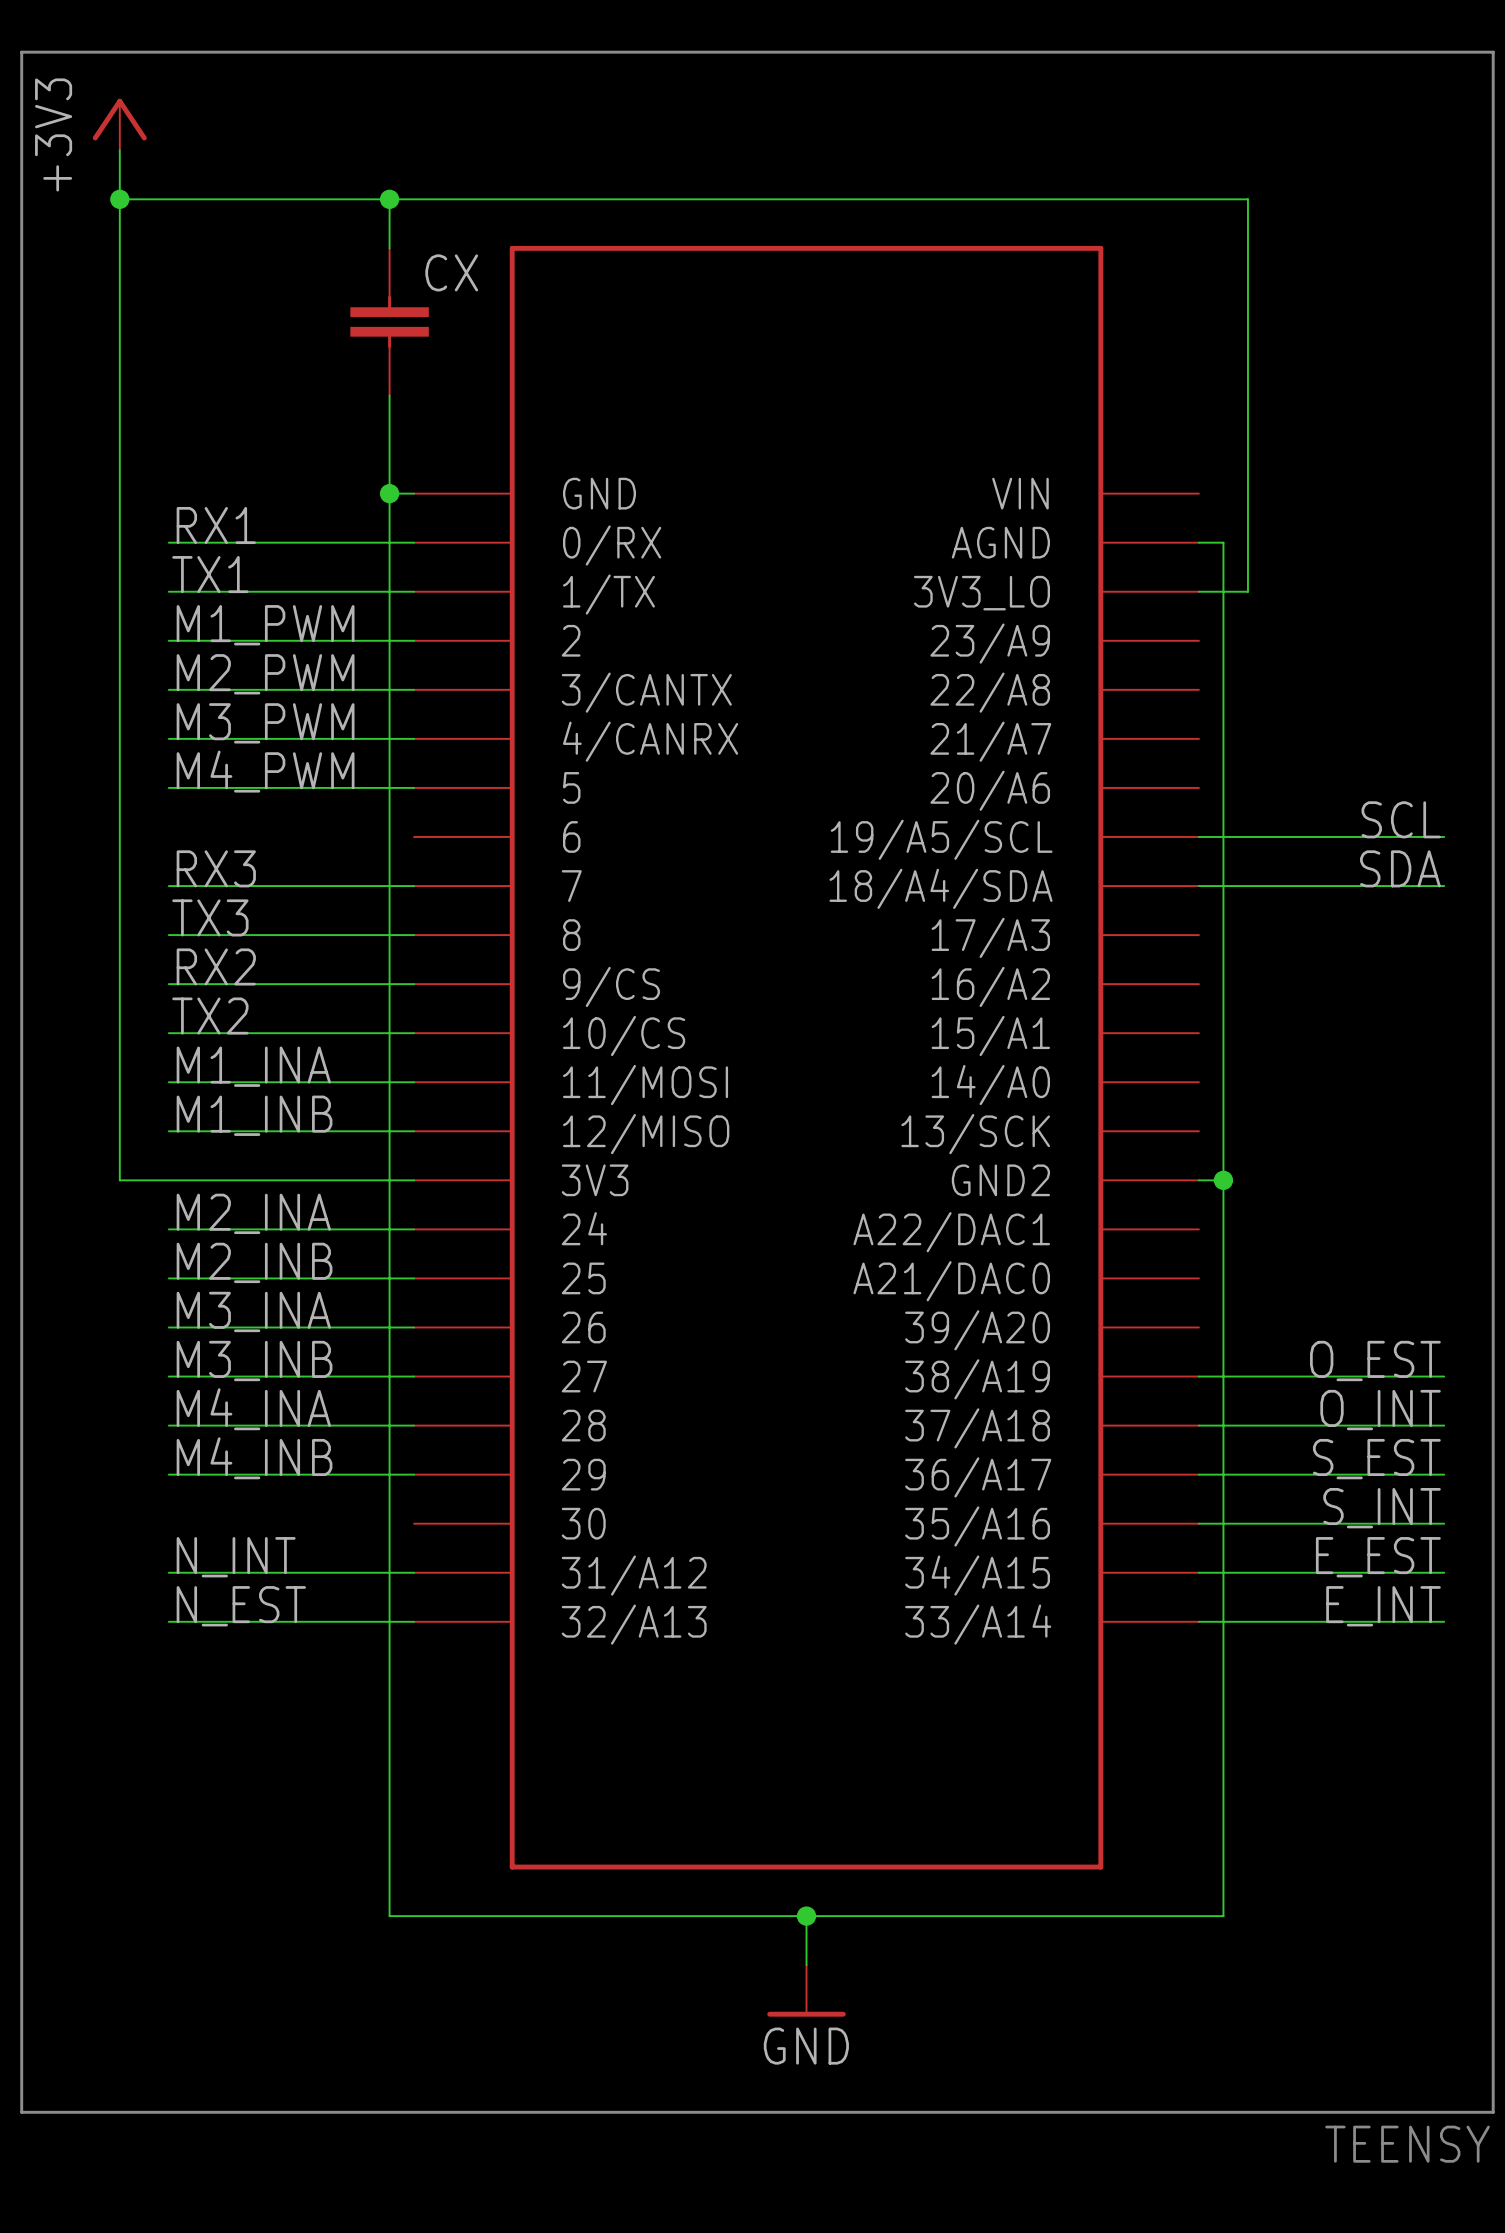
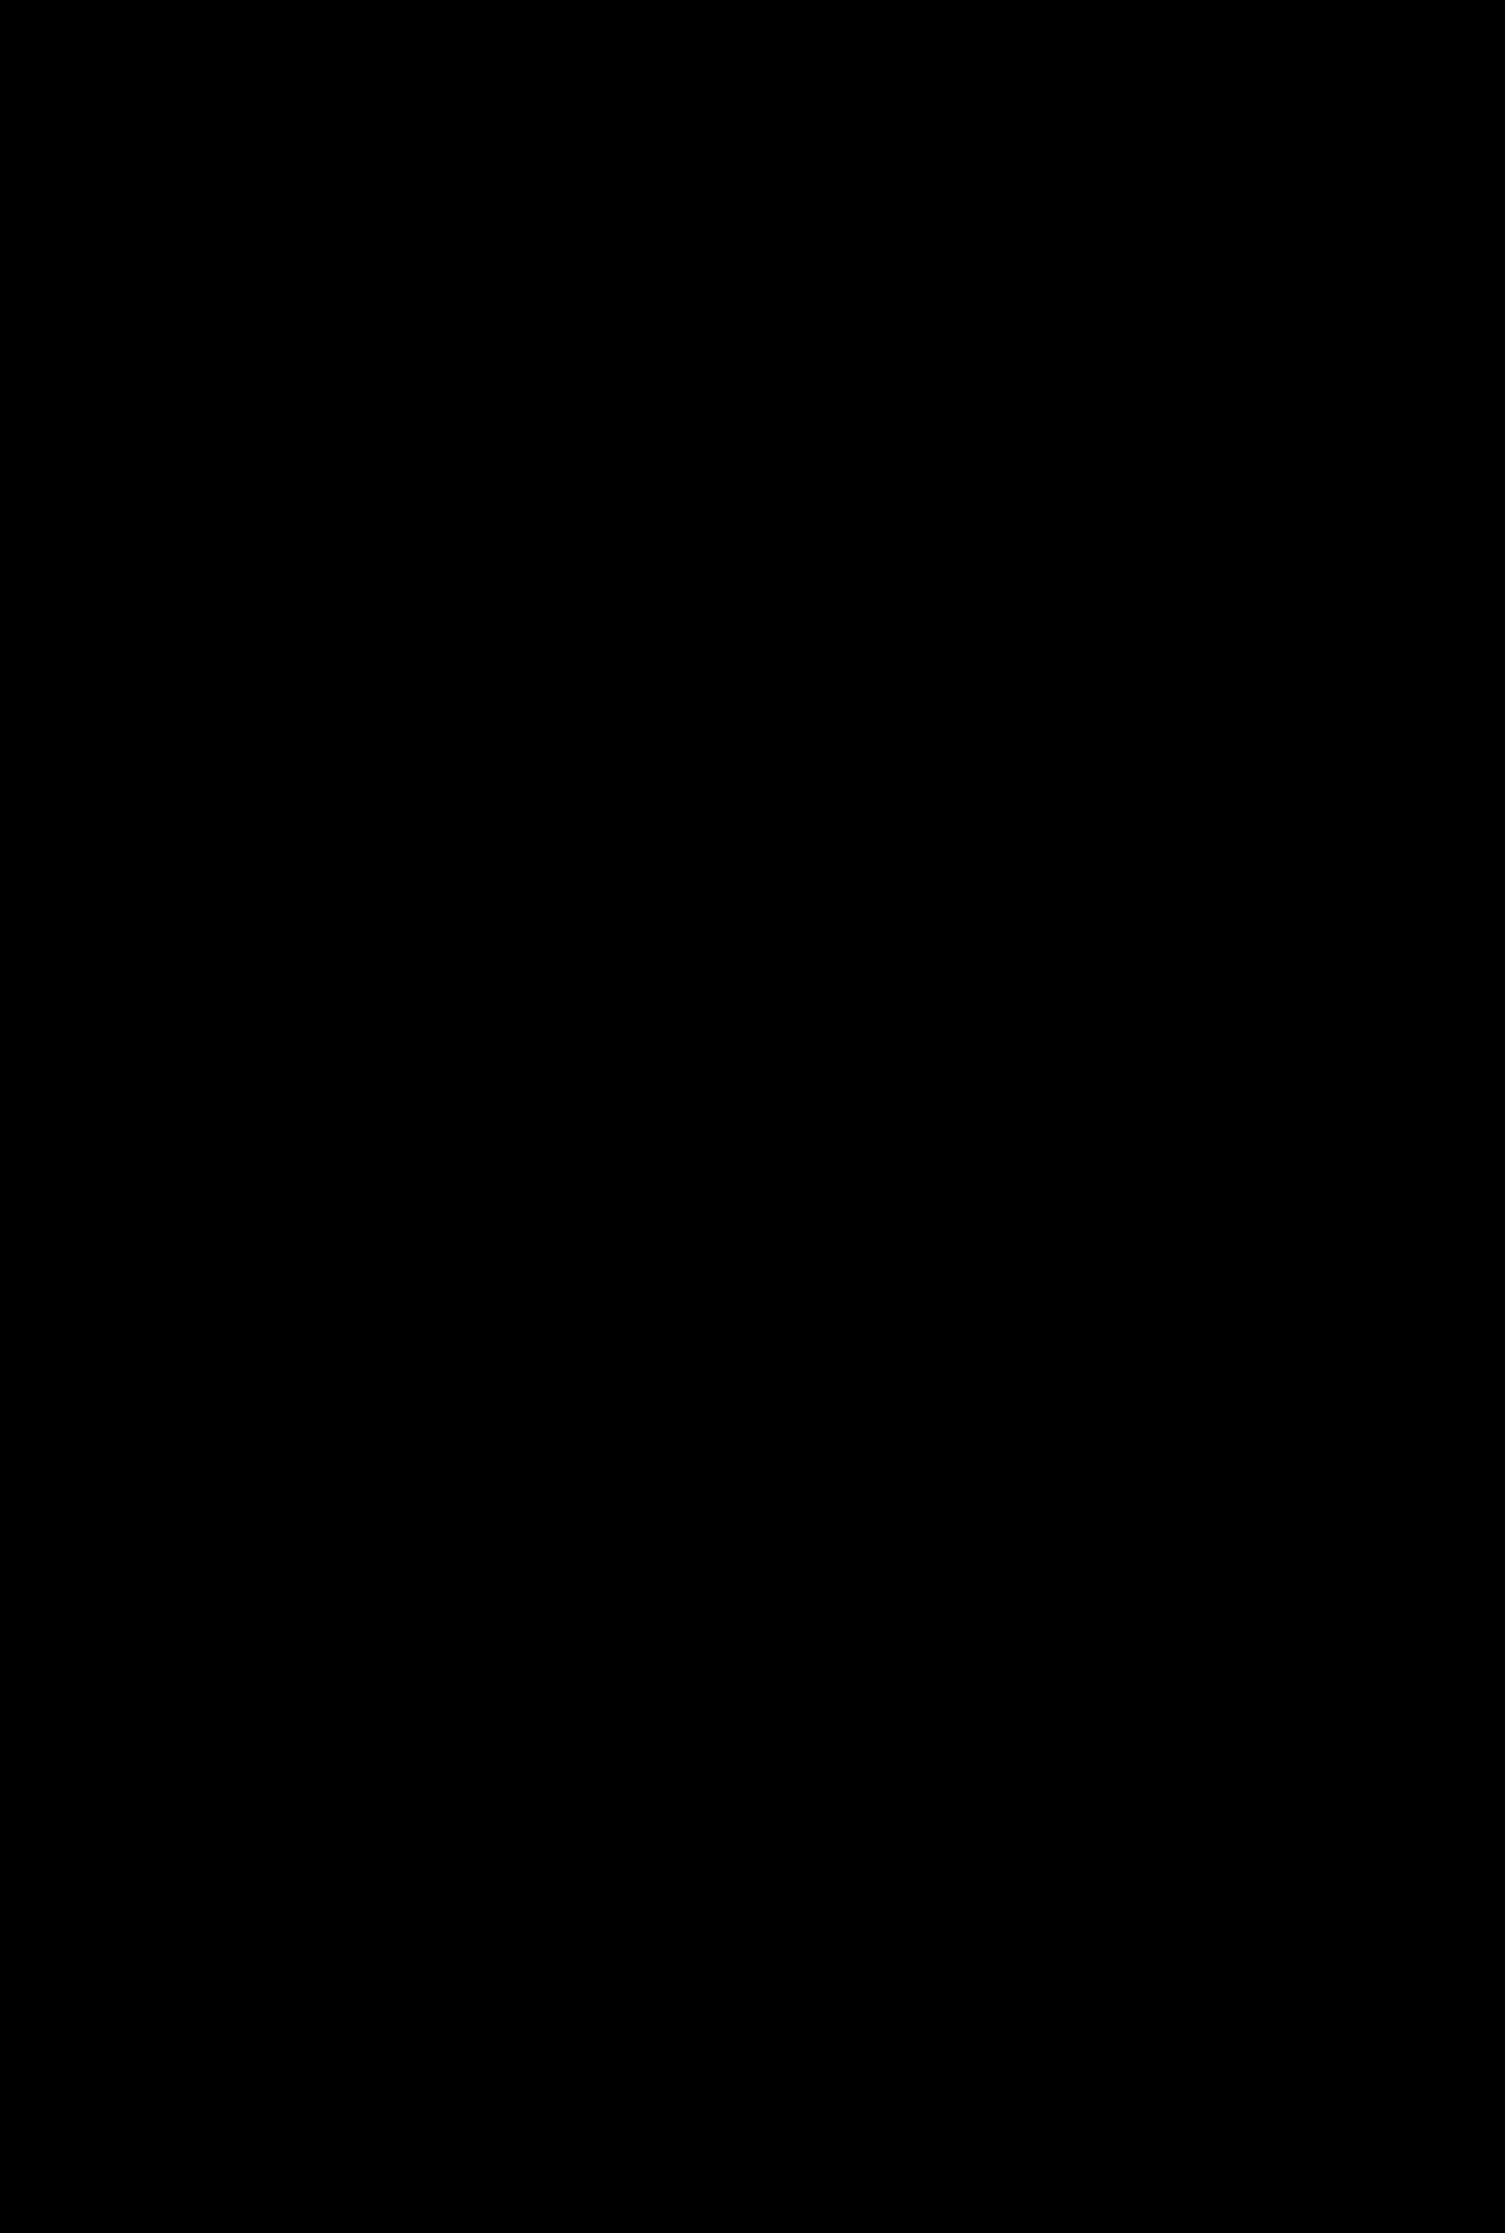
line: (21, 52) (1493, 52) (1493, 2112) (21, 2112) (21, 52) -> none
power symbol: +3V3 (119, 124) -> none
wire: (119, 150) (119, 1180) (414, 1180) -> none
wire: (119, 199) (1247, 199) (1247, 591) (1198, 591) -> none
junction: (119, 199) -> none
wire: (389, 199) (389, 248) -> none
junction: (389, 199) -> none
CX: (389, 321) -> none
wire: (389, 395) (389, 1916) (1223, 1916) (1223, 542) (1198, 542) -> none
wire: (389, 493) (414, 493) -> none
junction: (389, 493) -> none
label: RX1 (216, 525) -> none
wire: (168, 542) (414, 542) -> none
label: TX1 (210, 574) -> none
wire: (168, 591) (414, 591) -> none
label: M1_PWM (265, 625) -> none
wire: (168, 640) (414, 640) -> none
label: M2_PWM (265, 674) -> none
wire: (168, 689) (414, 689) -> none
label: M3_PWM (265, 723) -> none
wire: (168, 738) (414, 738) -> none
label: M4_PWM (265, 771) -> none
wire: (168, 787) (414, 787) -> none
label: SCL (1401, 819) -> none
wire: (1198, 836) (1444, 836) -> none
label: RX3 (216, 868) -> none
label: SDA (1400, 868) -> none
wire: (168, 886) (414, 886) -> none
wire: (1198, 886) (1444, 886) -> none
label: TX3 (210, 917) -> none
wire: (168, 935) (414, 935) -> none
label: RX2 (216, 966) -> none
wire: (168, 984) (414, 984) -> none
label: TX2 (210, 1016) -> none
wire: (168, 1033) (414, 1033) -> none
part: (806, 1057) -> none
label: M1_INA (253, 1066) -> none
wire: (168, 1082) (414, 1082) -> none
label: M1_INB (254, 1115) -> none
wire: (168, 1131) (414, 1131) -> none
wire: (1198, 1180) (1223, 1180) -> none
junction: (1223, 1180) -> none
label: M2_INA (253, 1213) -> none
wire: (168, 1229) (414, 1229) -> none
label: M2_INB (254, 1262) -> none
wire: (168, 1278) (414, 1278) -> none
label: M3_INA (253, 1311) -> none
wire: (168, 1327) (414, 1327) -> none
label: M3_INB (254, 1361) -> none
label: O_EST (1375, 1361) -> none
wire: (168, 1376) (414, 1376) -> none
wire: (1198, 1376) (1444, 1376) -> none
label: M4_INA (253, 1409) -> none
label: O_INT (1380, 1410) -> none
wire: (168, 1425) (414, 1425) -> none
wire: (1198, 1425) (1444, 1425) -> none
label: M4_INB (254, 1458) -> none
label: S_EST (1376, 1459) -> none
wire: (168, 1474) (414, 1474) -> none
wire: (1198, 1474) (1444, 1474) -> none
label: S_INT (1382, 1508) -> none
wire: (1198, 1523) (1444, 1523) -> none
label: N_INT (236, 1557) -> none
label: E_EST (1378, 1557) -> none
wire: (168, 1572) (414, 1572) -> none
wire: (1198, 1572) (1444, 1572) -> none
label: N_EST (241, 1606) -> none
label: E_INT (1383, 1606) -> none
wire: (168, 1621) (414, 1621) -> none
wire: (1198, 1621) (1444, 1621) -> none
wire: (806, 1916) (806, 1965) -> none
junction: (806, 1916) -> none
power symbol: GND (806, 1990) -> none
text: TEENSY (1407, 2144) -> none

